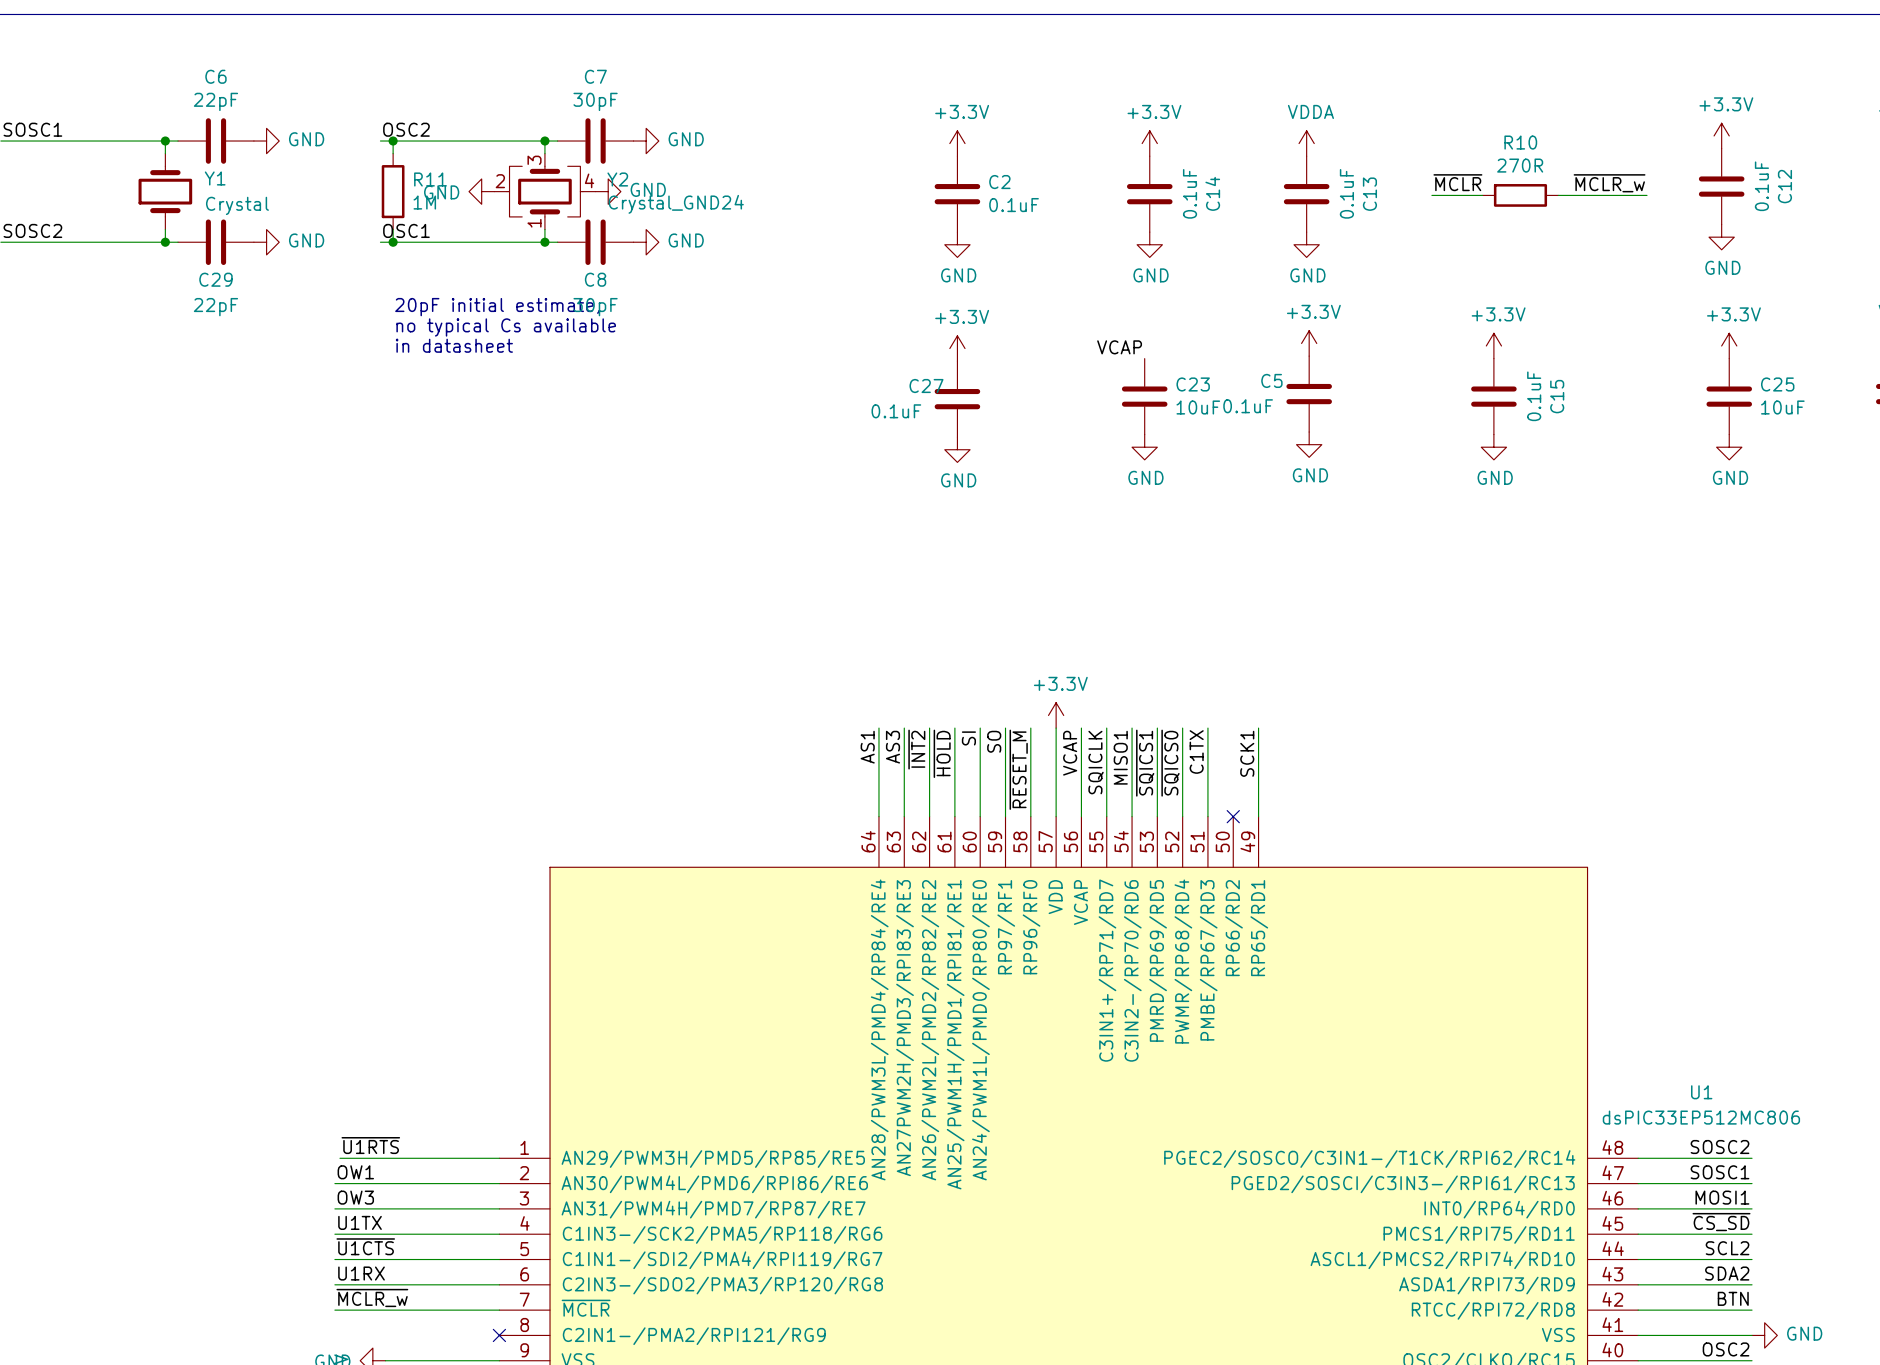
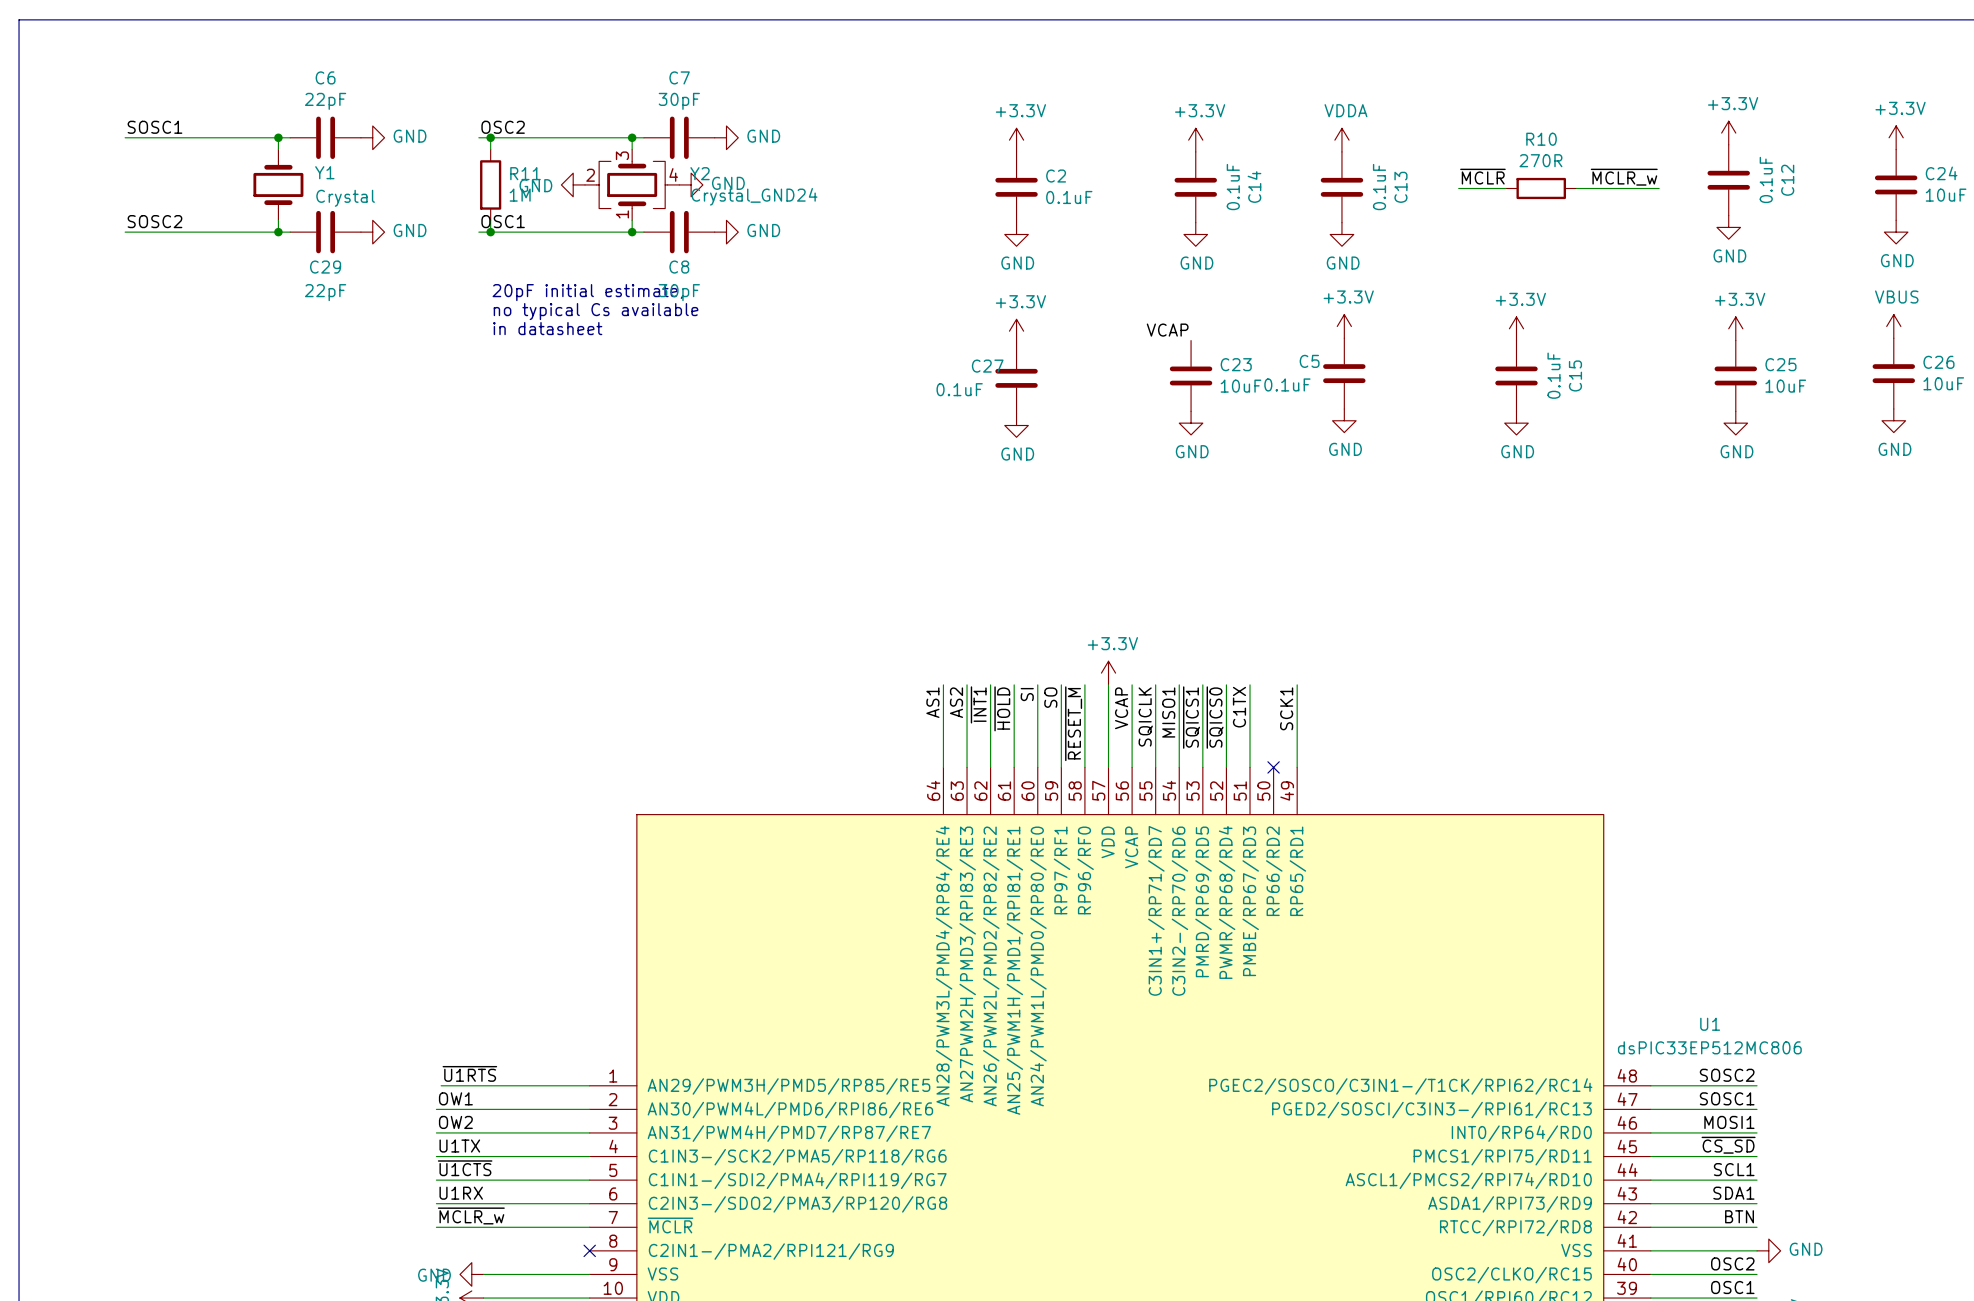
label: AS3 (892, 747) -> AS2 (956, 702)
label: ~{INT2} (916, 749) -> ~{INT1} (978, 704)
label: OW3 (355, 1197) -> OW2 (455, 1122)
label: SCL2 (1727, 1248) -> SCL1 (1734, 1169)
label: SDA2 (1727, 1273) -> SDA1 (1733, 1193)

